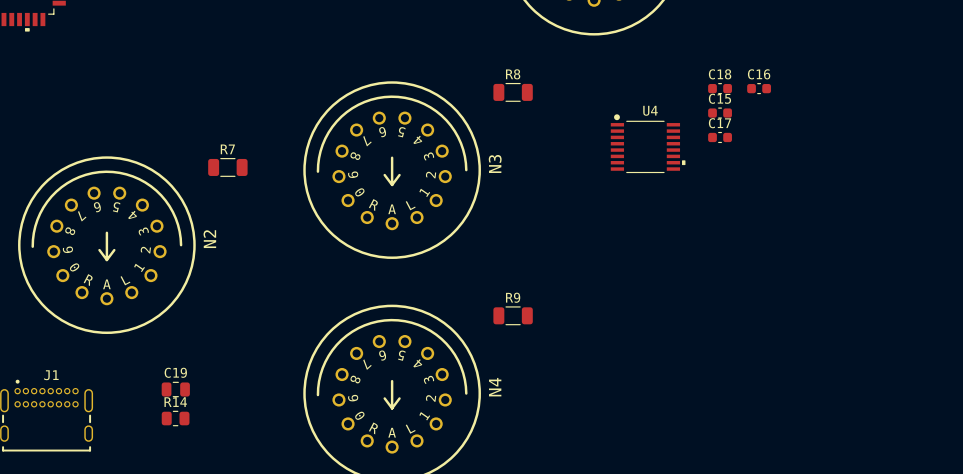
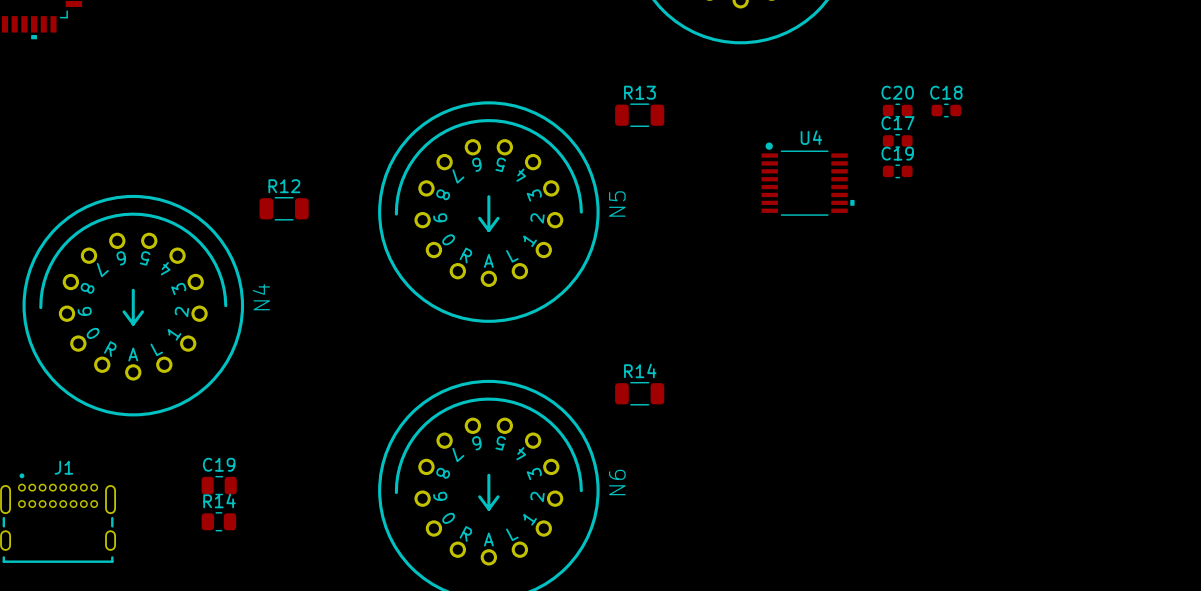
R8 name: R8 (513, 74) -> R13 (639, 92)
C18 name: C18 (720, 74) -> C20 (897, 92)
C16 name: C16 (759, 74) -> C18 (946, 92)
C15 name: C15 (719, 98) -> C17 (897, 123)
C17 name: C17 (720, 123) -> C19 (897, 153)
R7 name: R7 (227, 149) -> R12 (284, 186)
N3 name: N3 (495, 163) -> N5 (617, 204)
N2 name: N2 (209, 239) -> N4 (261, 297)
R9 name: R9 (513, 297) -> R14 (640, 370)
N4 name: N4 (495, 387) -> N6 (617, 482)

